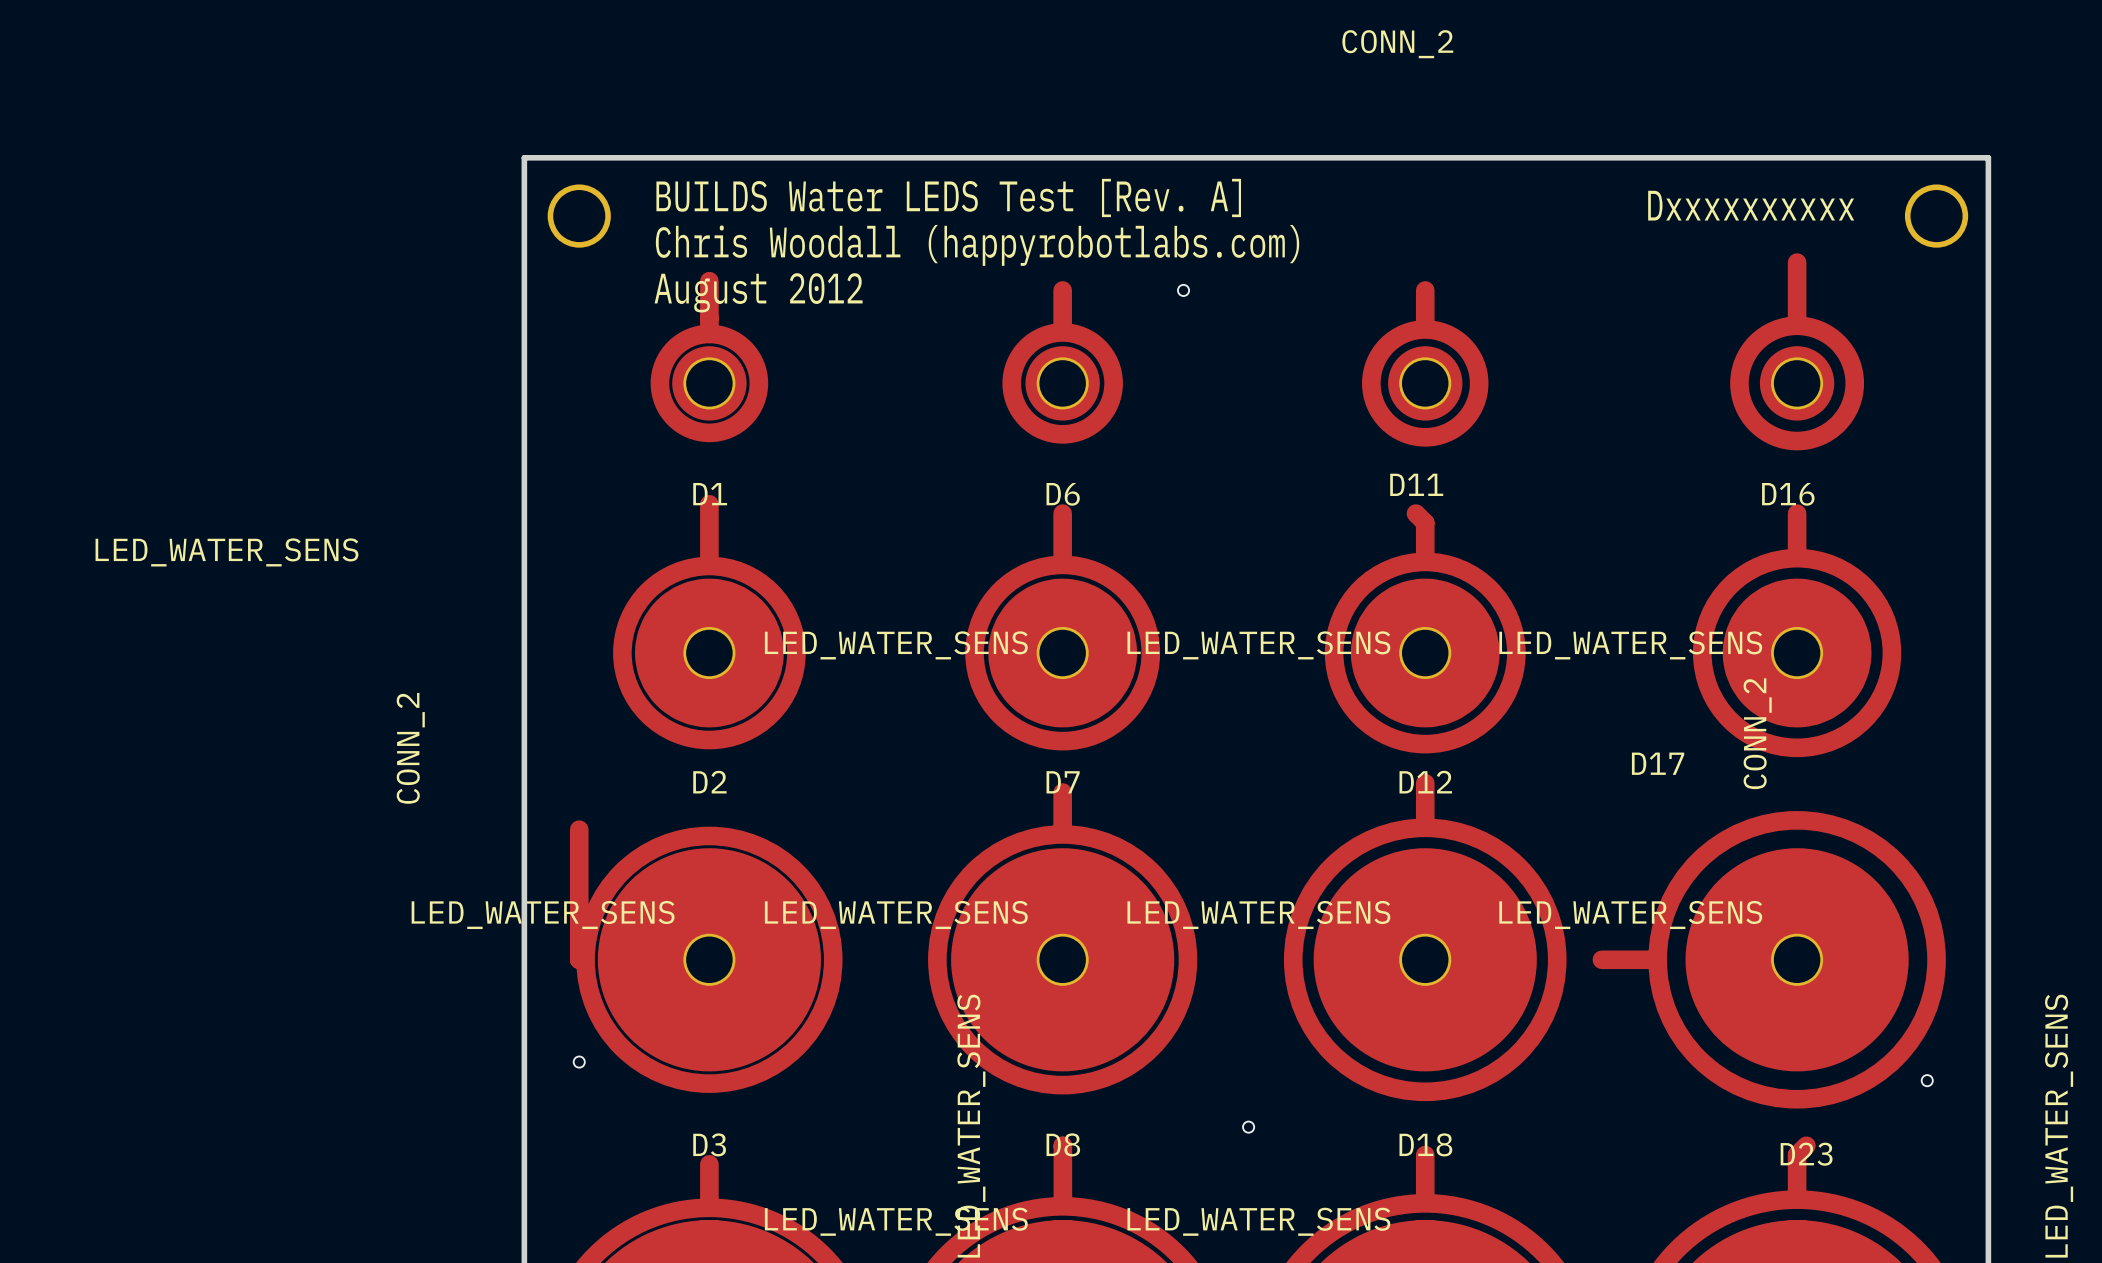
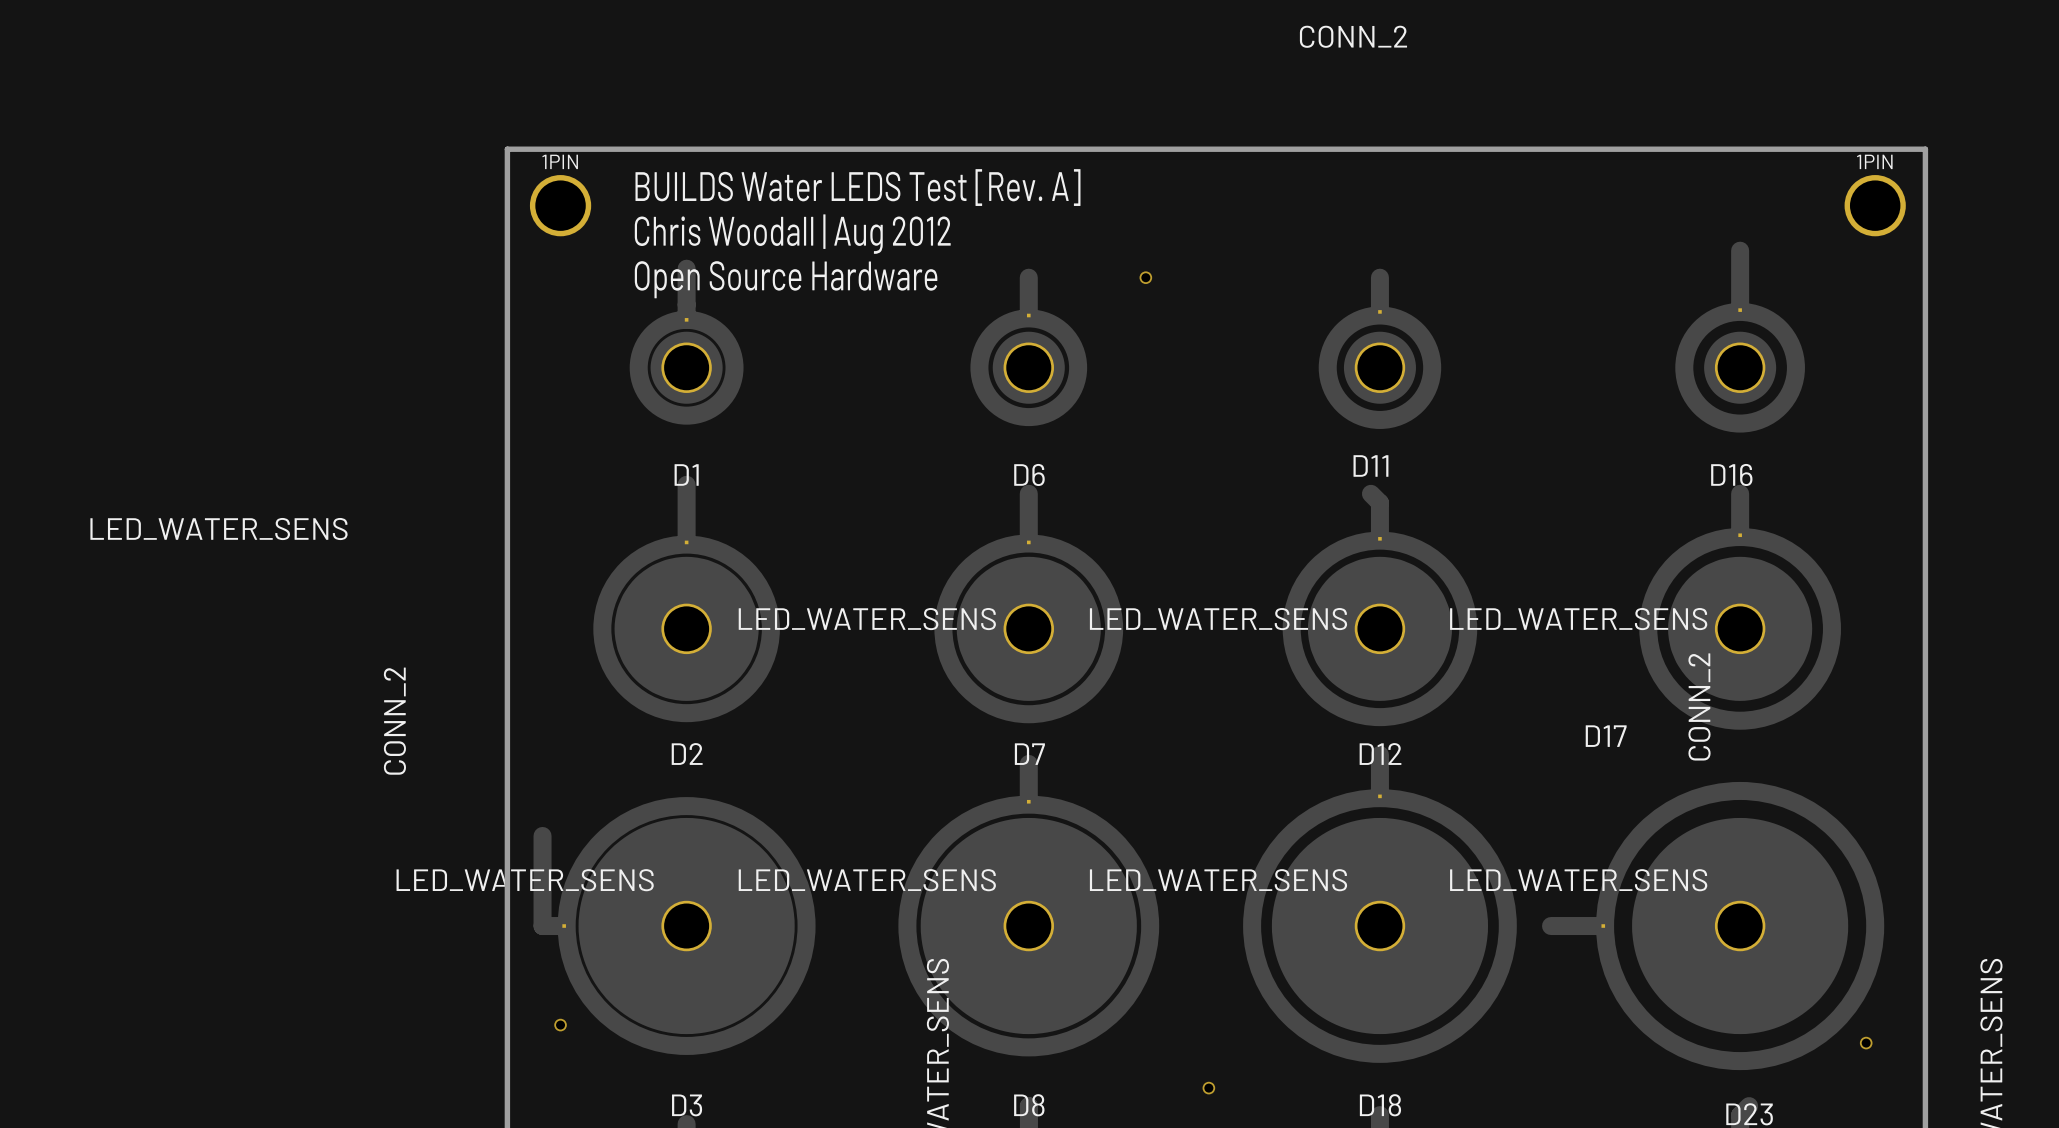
1PIN name: none -> 1PIN (560, 161)
1PIN name: none -> 1PIN (1874, 161)
text: Dxxxxxxxxxx (1751, 205) -> none
text: Chris Woodall (happyrobotlabs.com) (977, 245) -> Chris Woodall | Aug 2012 (792, 234)
text: August 2012 (758, 292) -> Open Source Hardware (786, 279)
track: (579, 829) (579, 959) -> (542, 835) (542, 926) (560, 926)

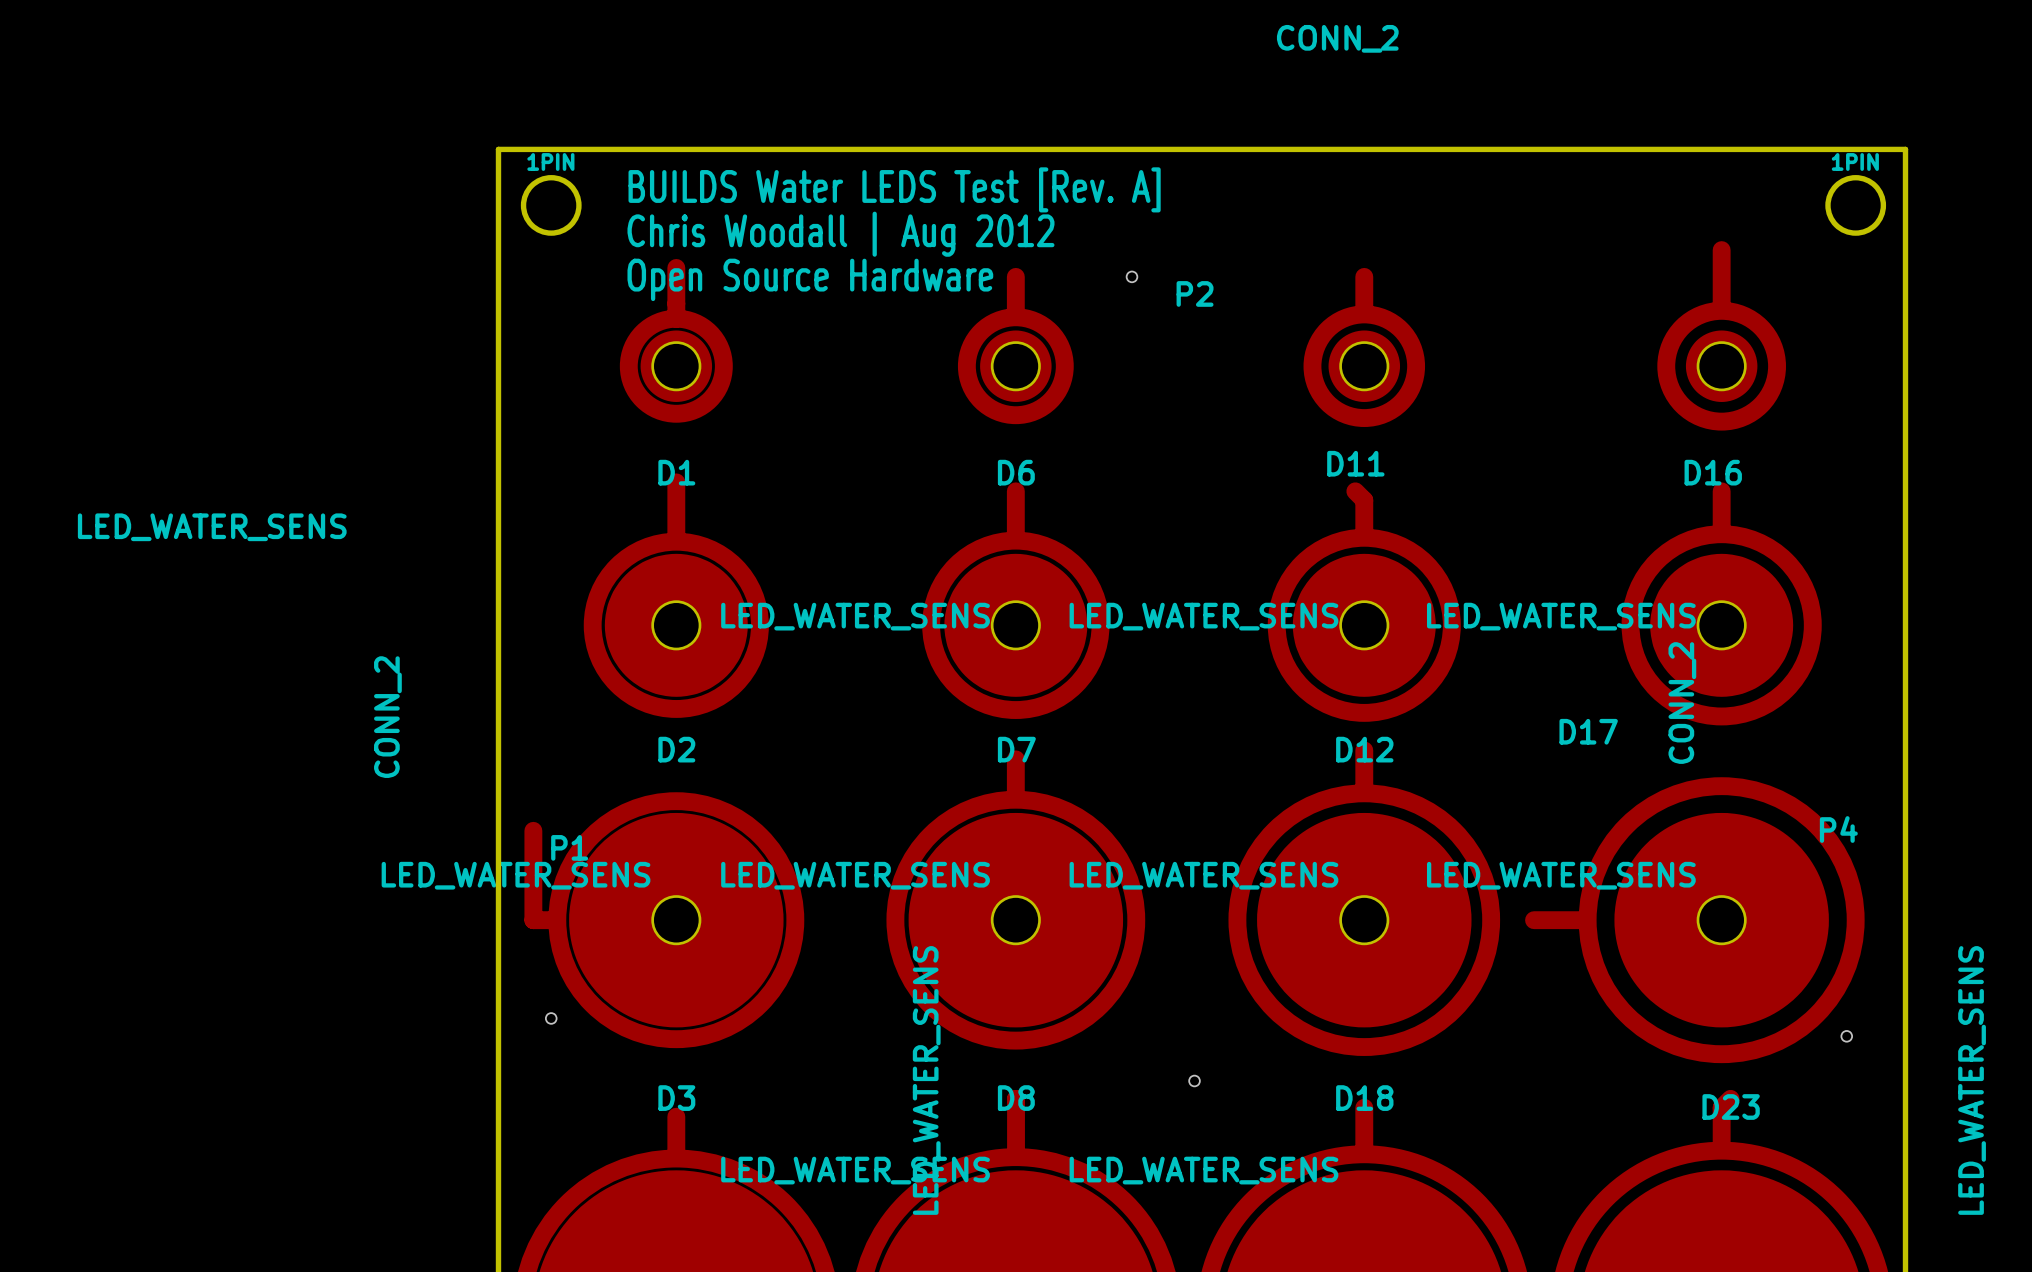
P2: none -> CONN_2 (1287, 165)
P4: none -> CONN_2 (1763, 742)
P1: none -> CONN_2 (481, 758)

